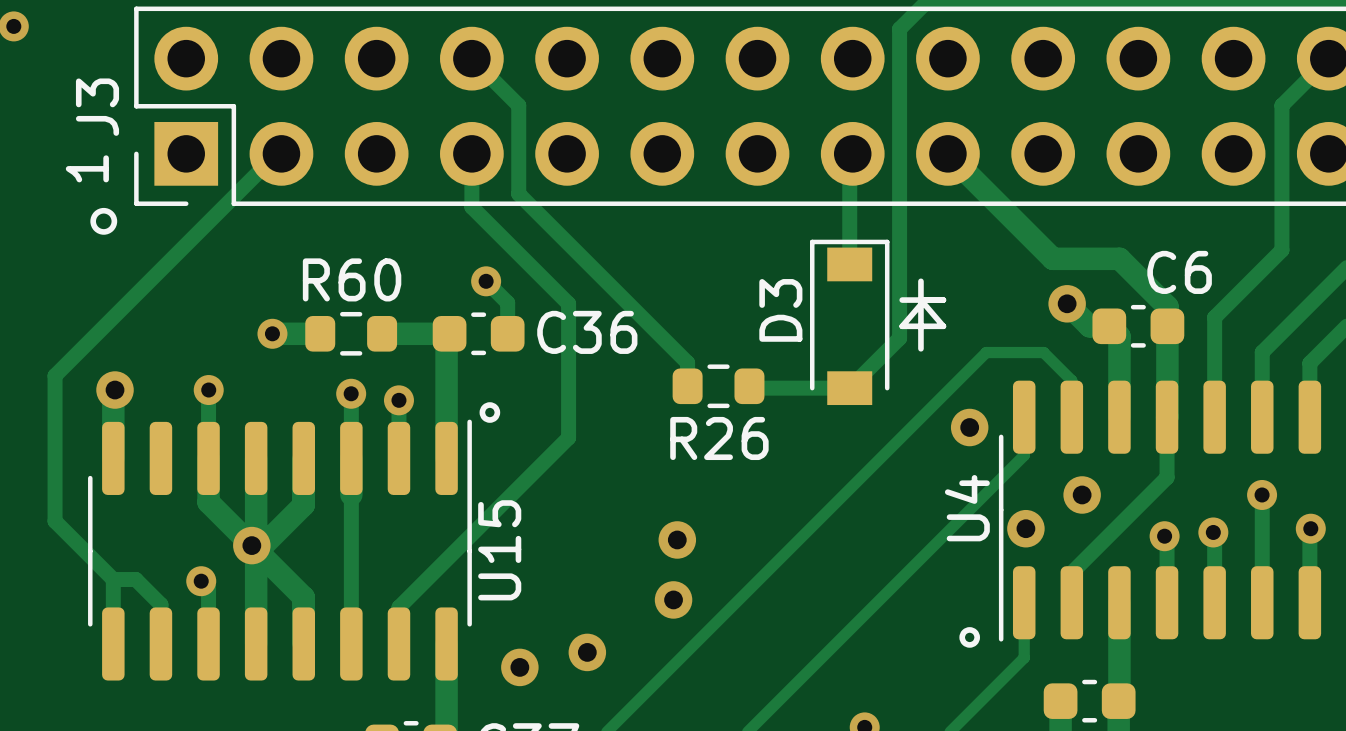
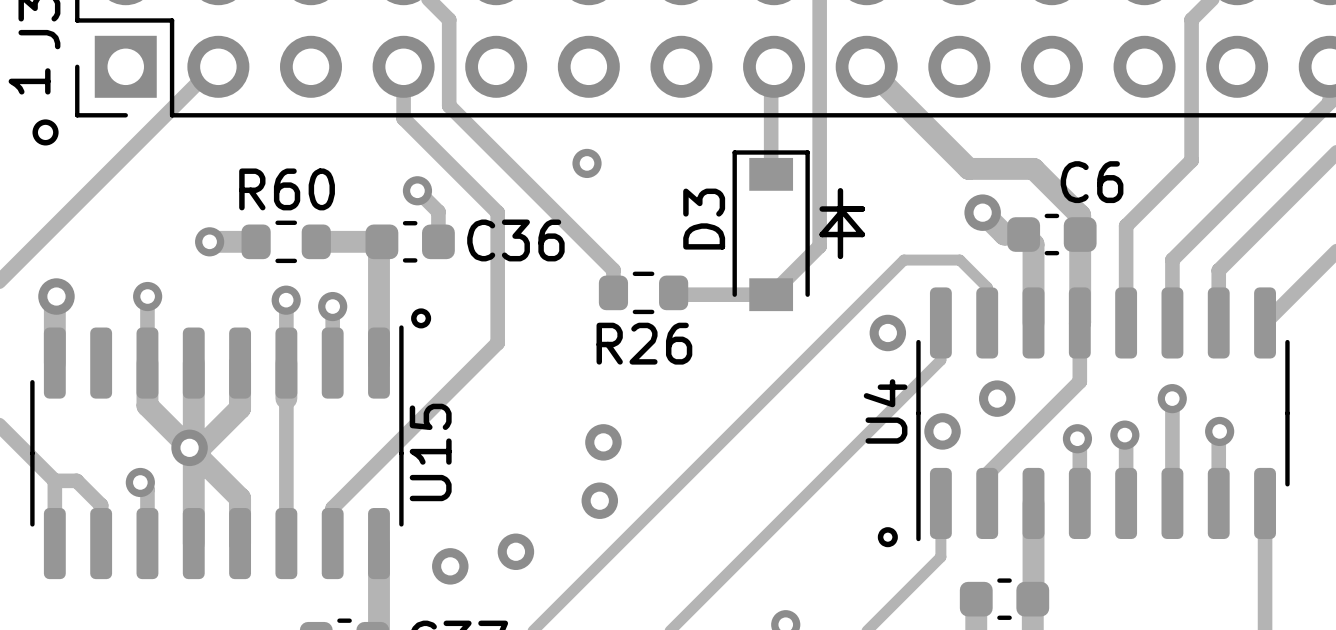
via: none -> (587, 163)

